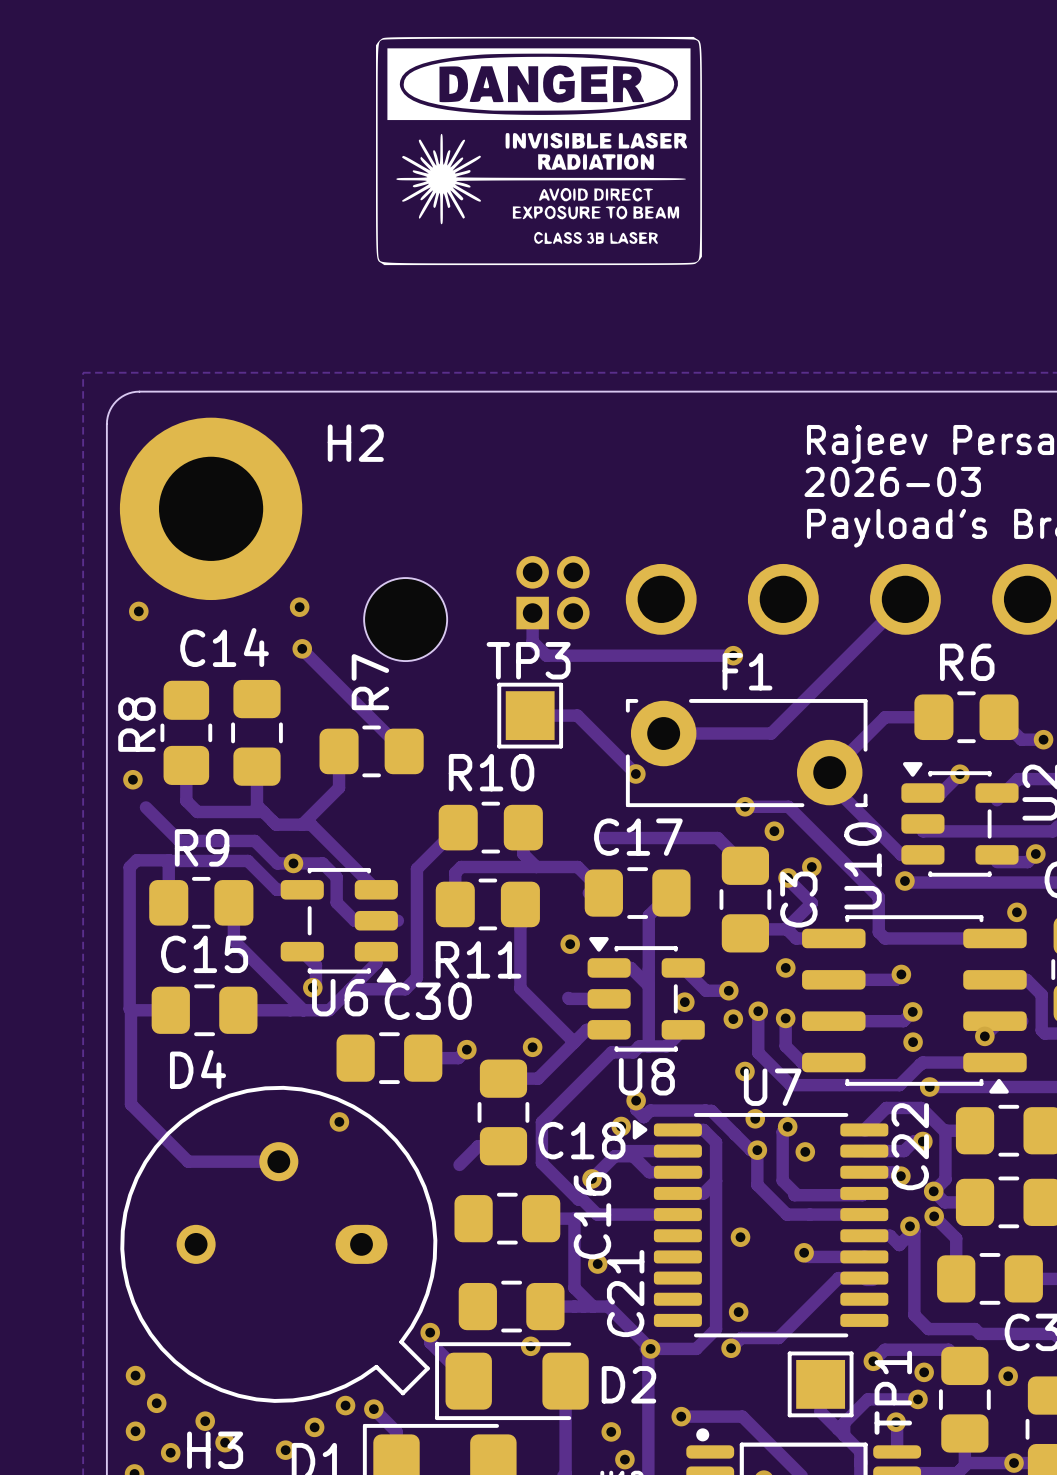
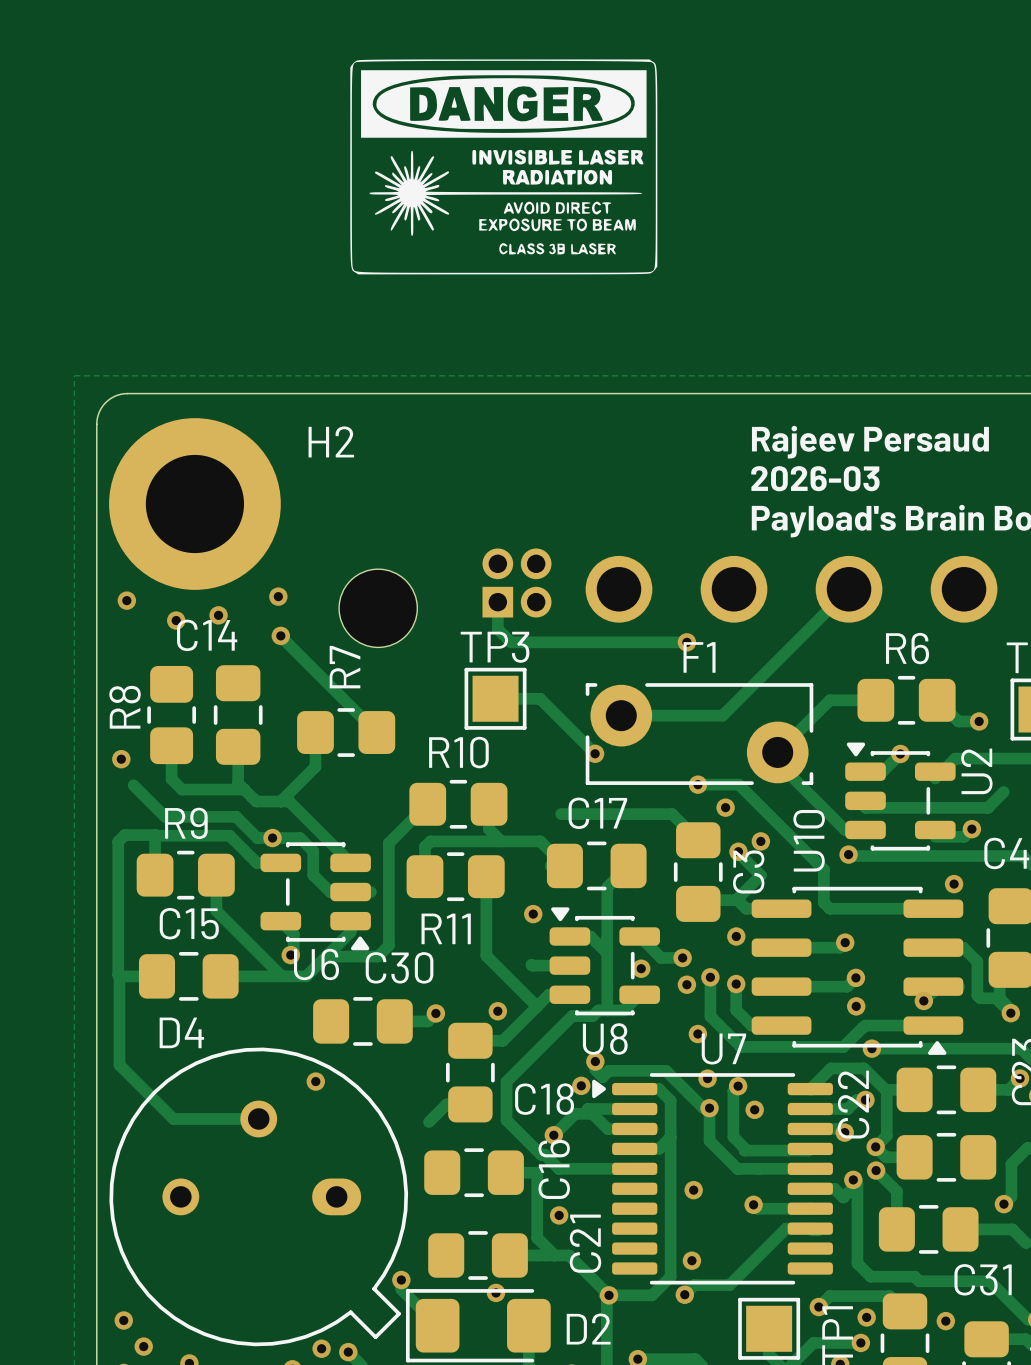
via: none -> (218, 615)
via: none -> (176, 620)

